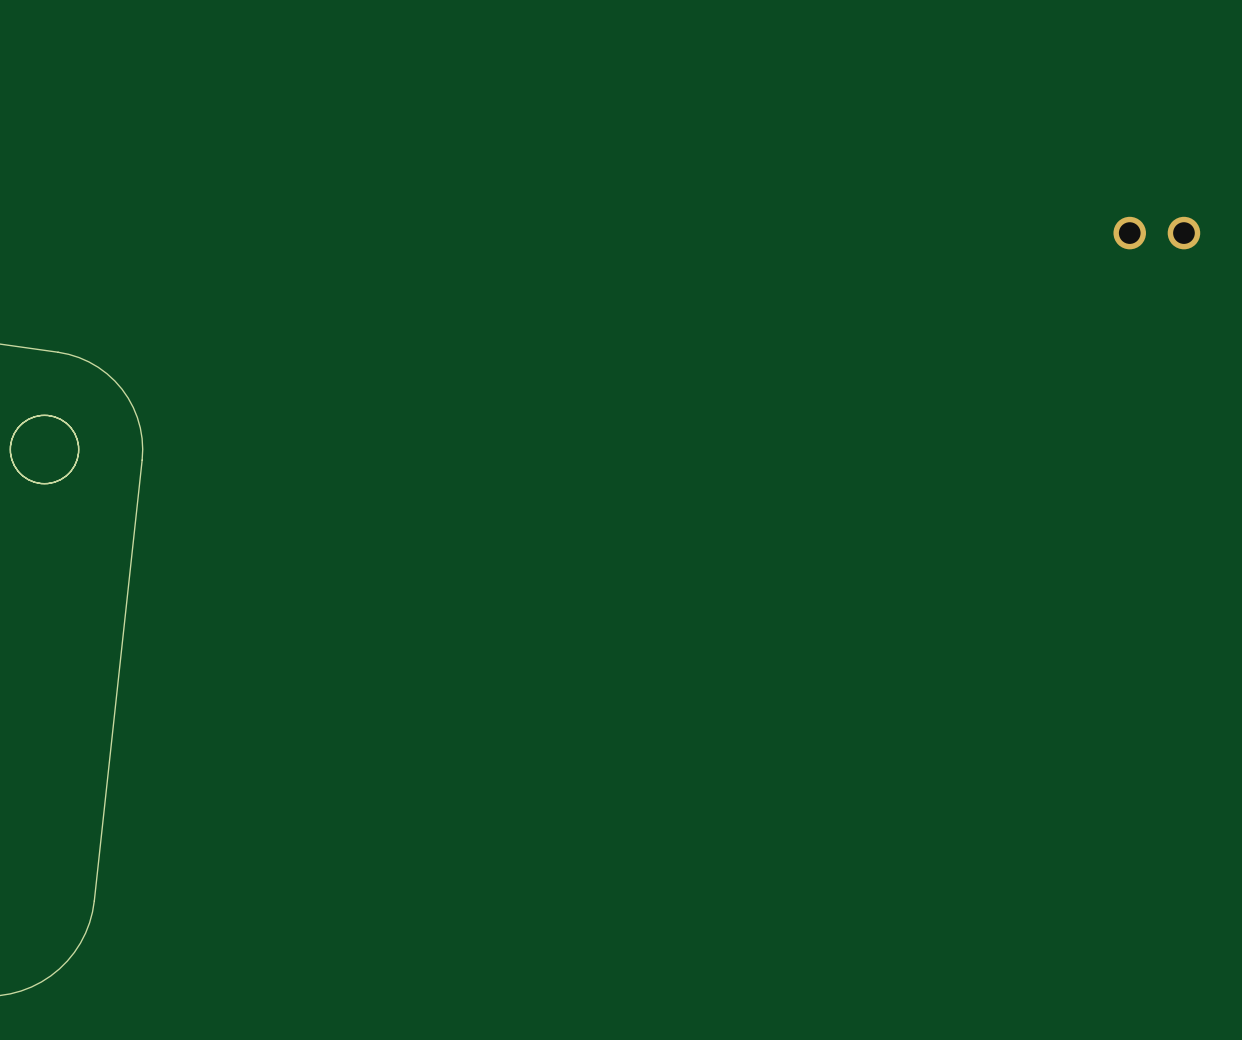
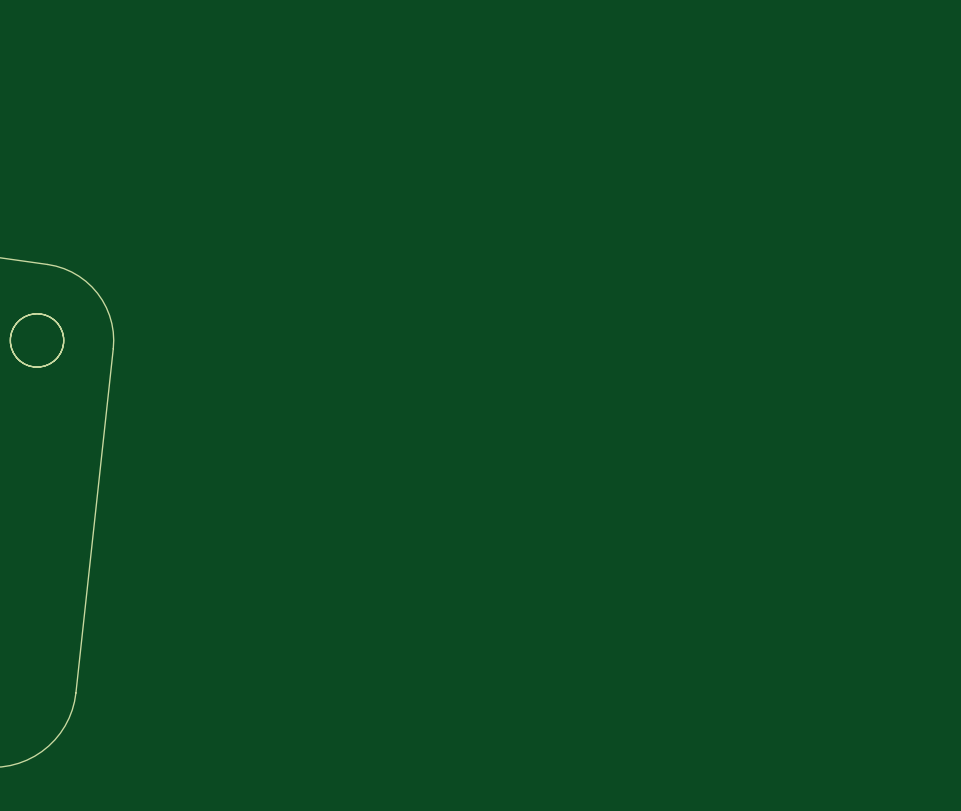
part: (1156, 233) -> none

